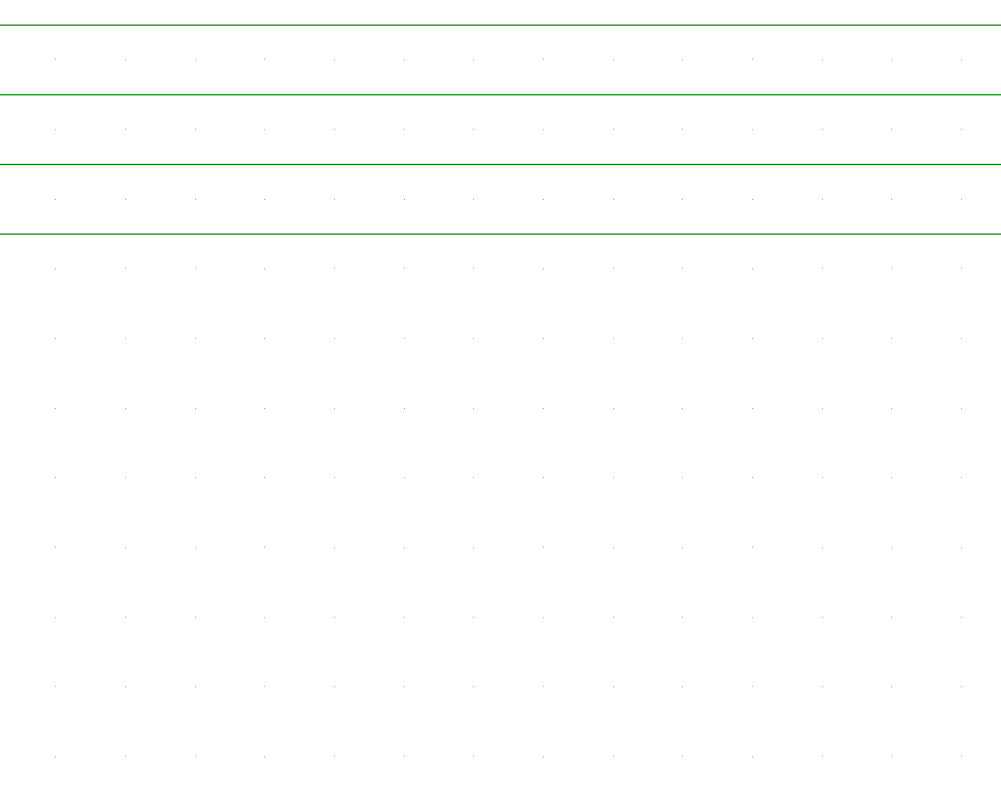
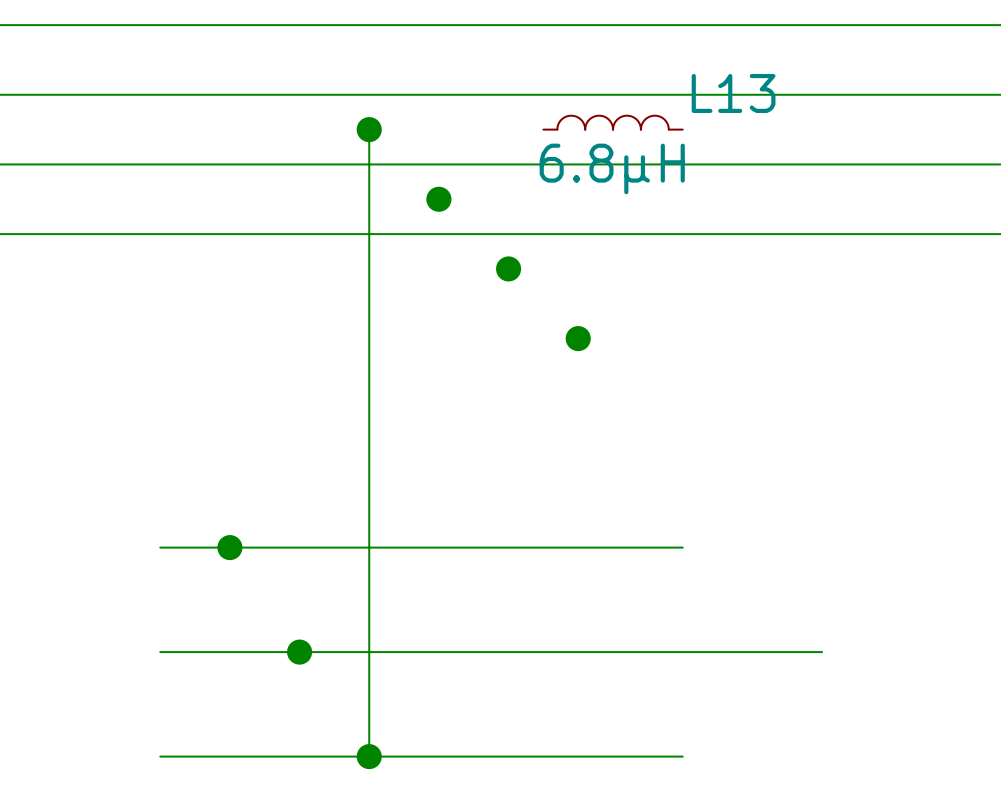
L13: none -> 6.8µH (613, 122)
wire: none -> (369, 129) (369, 756)
junction: none -> (369, 129)
junction: none -> (438, 199)
junction: none -> (508, 268)
junction: none -> (578, 338)
wire: none -> (160, 547) (682, 547)
junction: none -> (229, 547)
wire: none -> (160, 652) (822, 652)
junction: none -> (299, 652)
wire: none -> (160, 756) (682, 756)
junction: none -> (369, 756)

